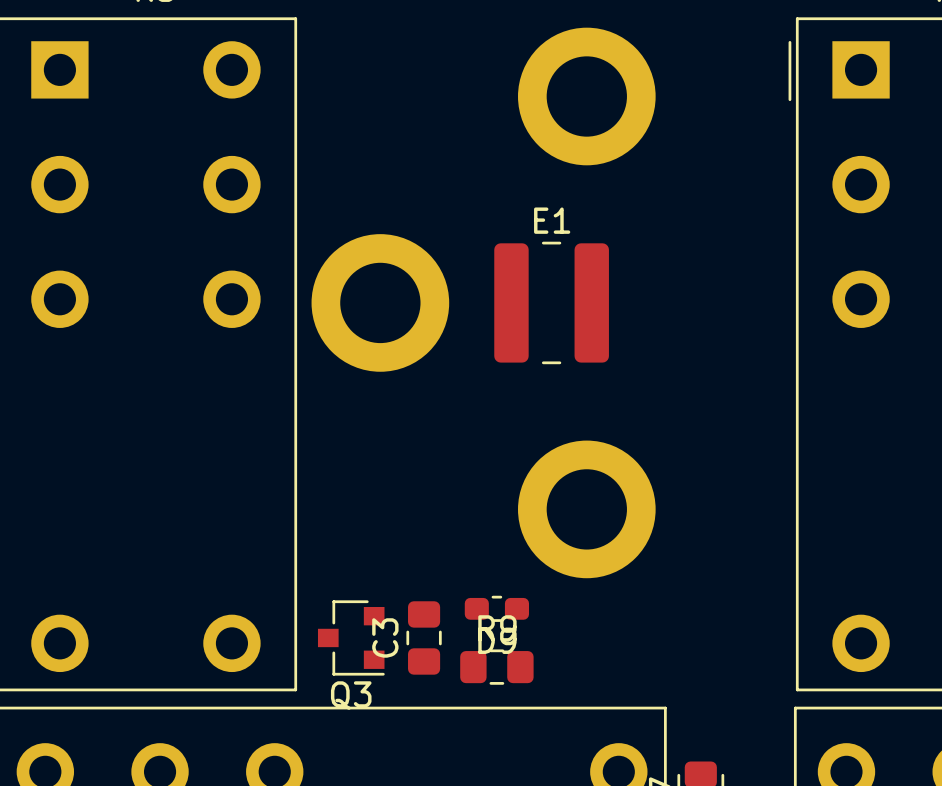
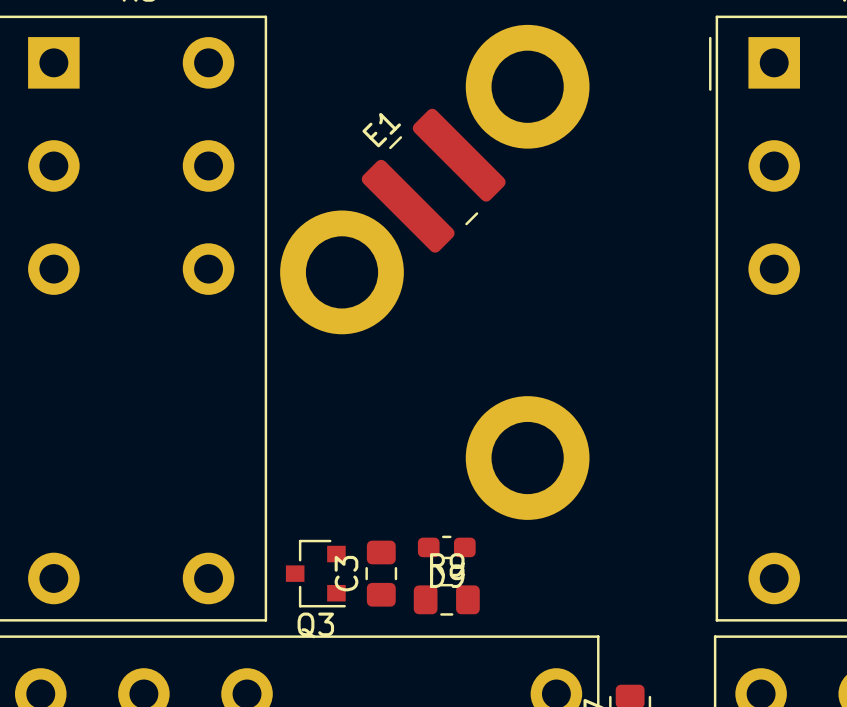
E1 rotation: 0° (551, 302) -> 45° counterclockwise (433, 180)
E1 position: (551, 302) -> (433, 180)

